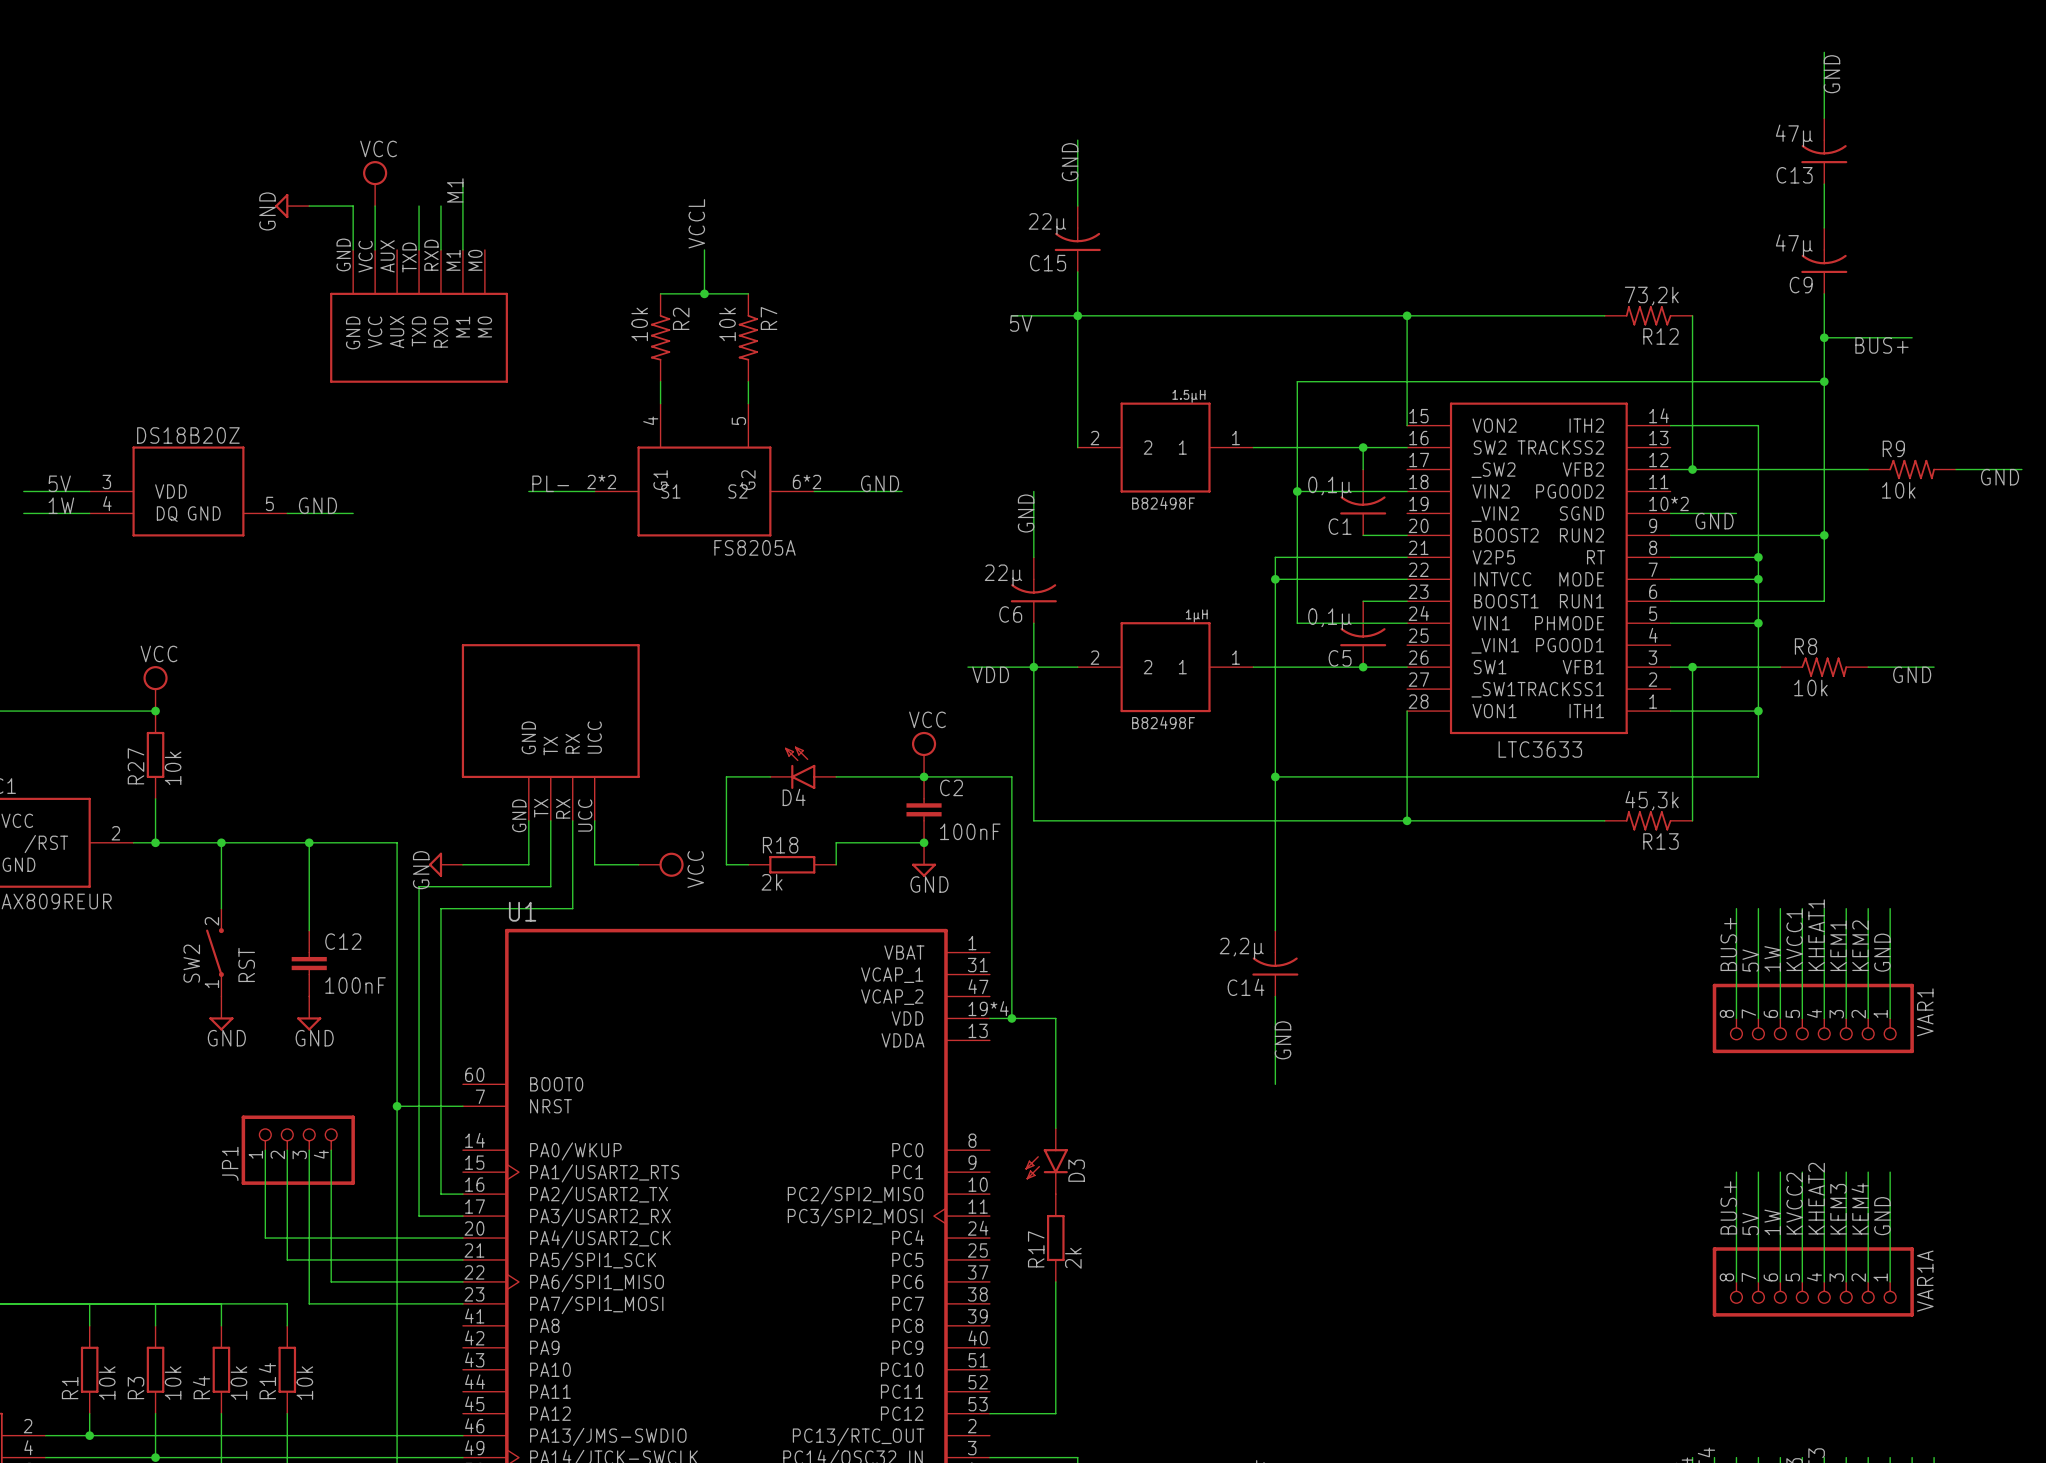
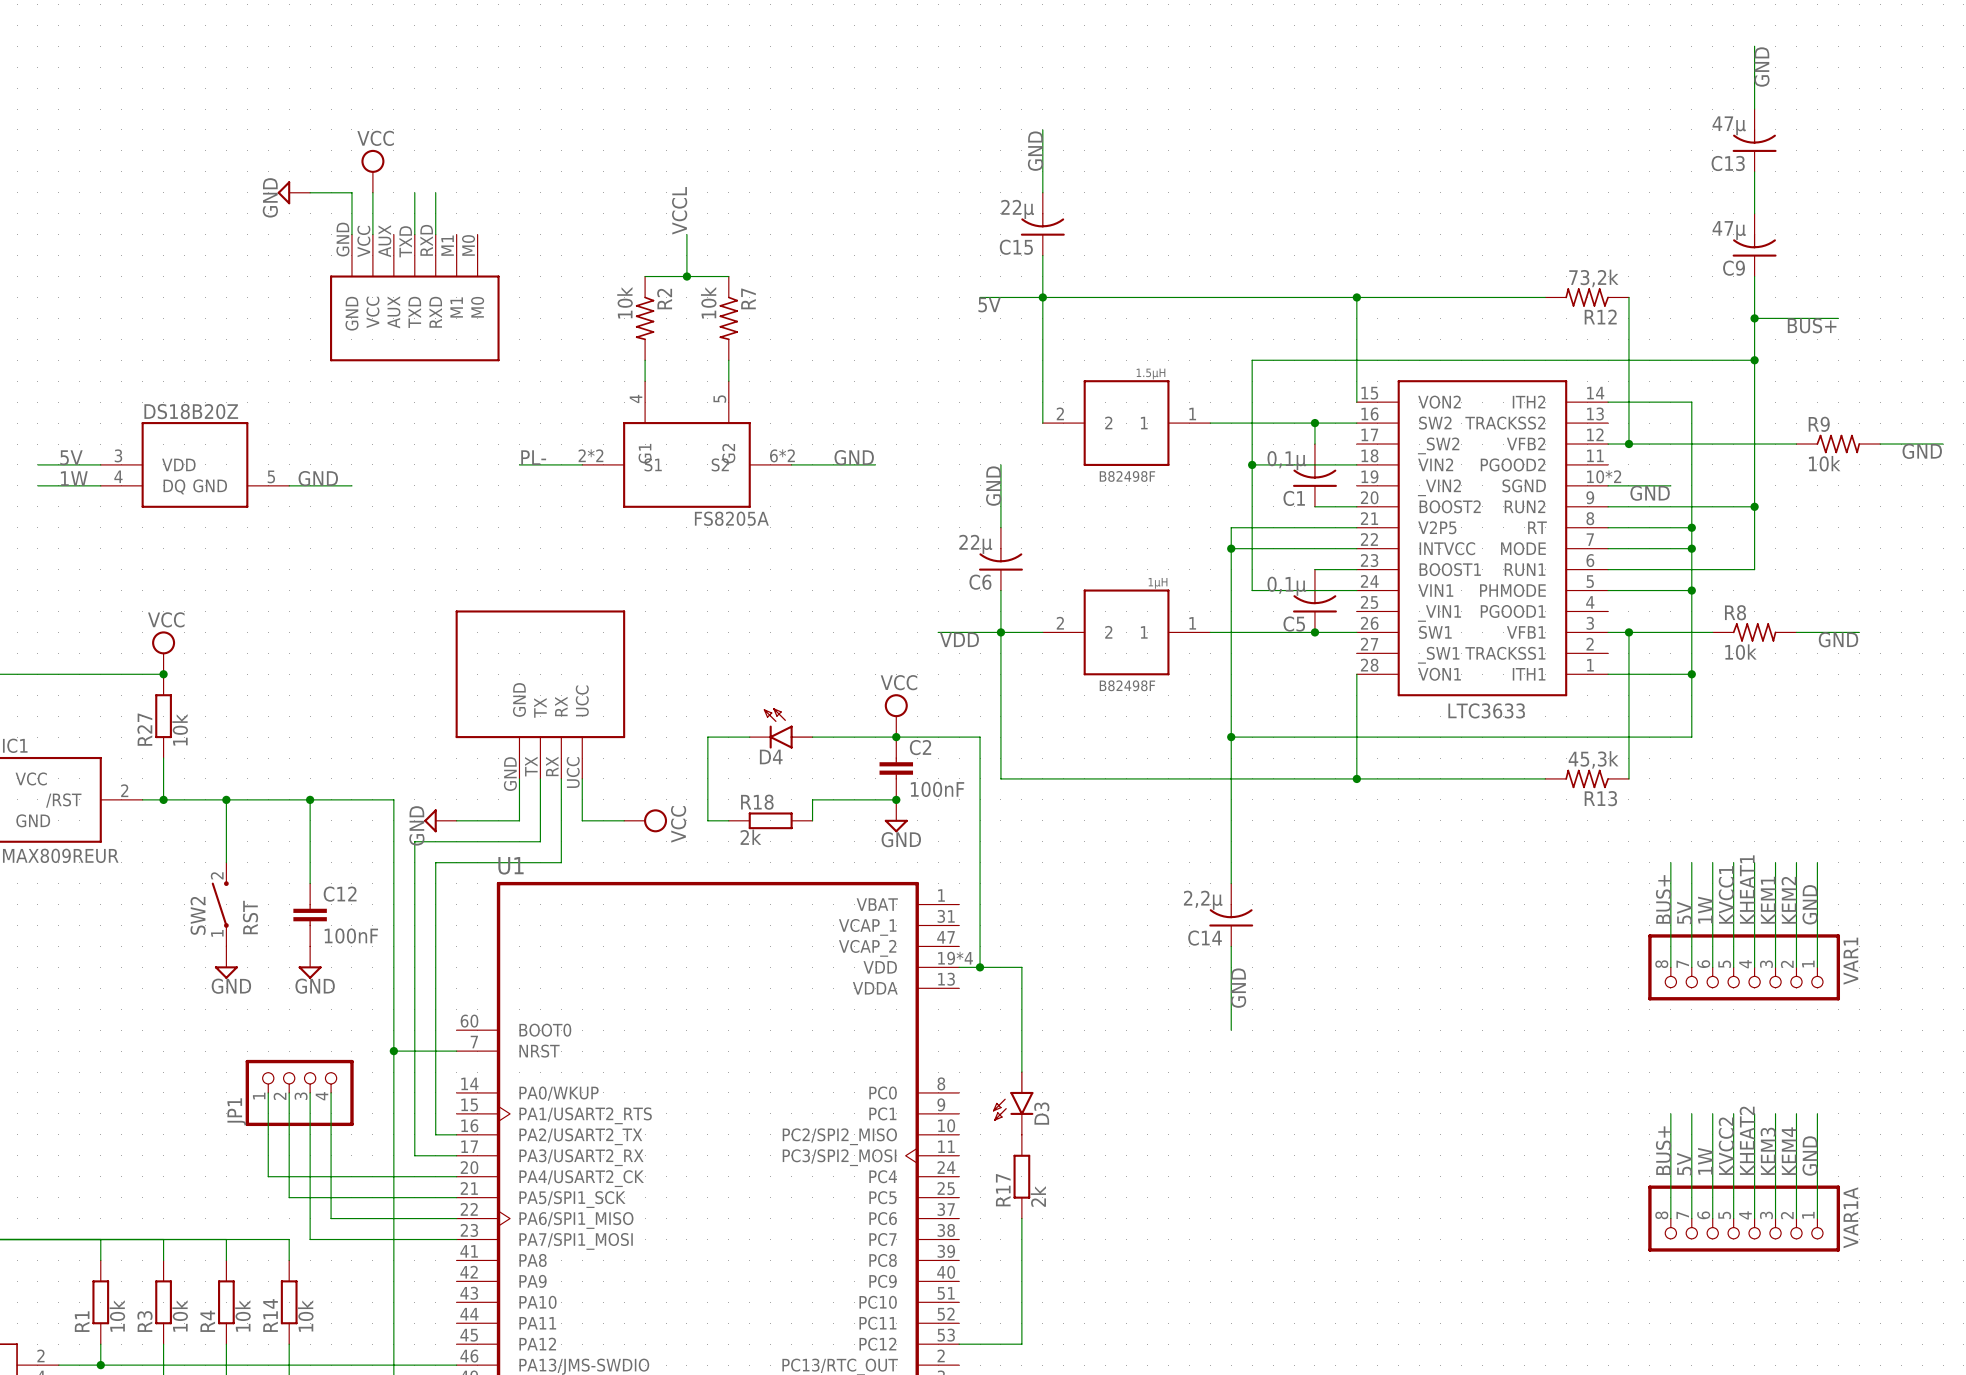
wire: (462, 184) (462, 249) -> none
label: M1 (455, 190) -> none

